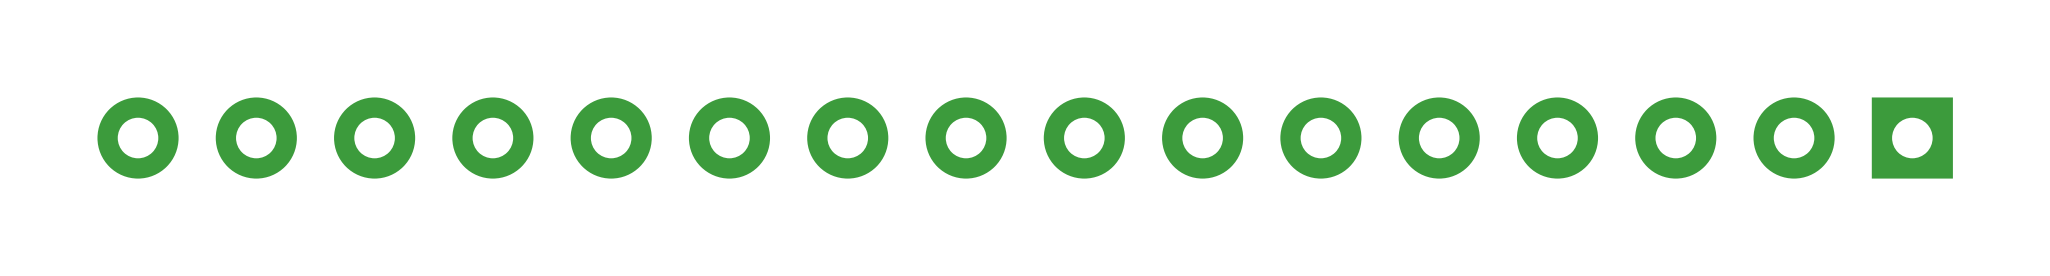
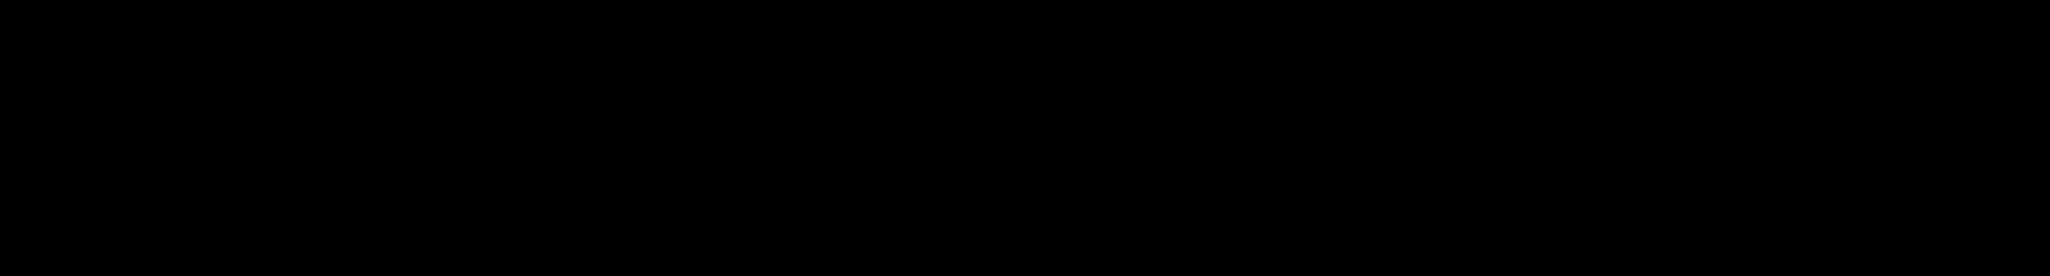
part: (1025, 138) -> none

